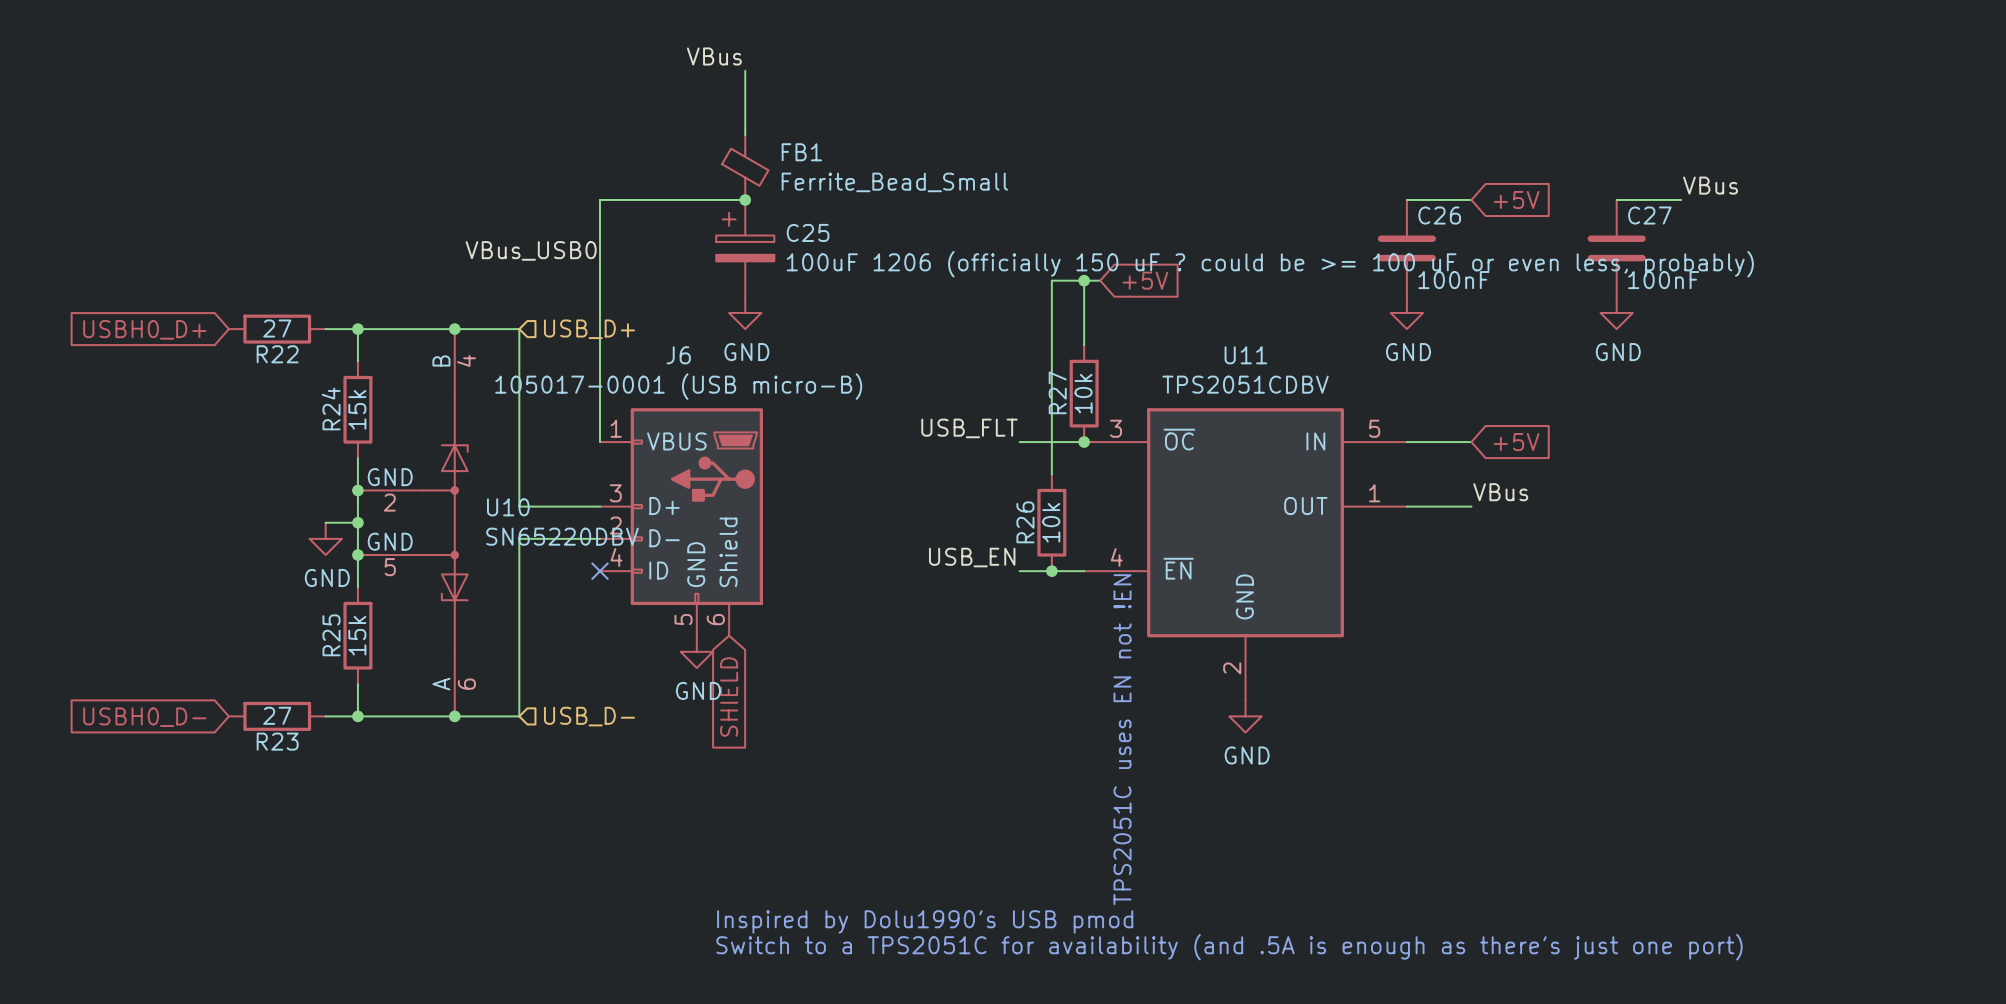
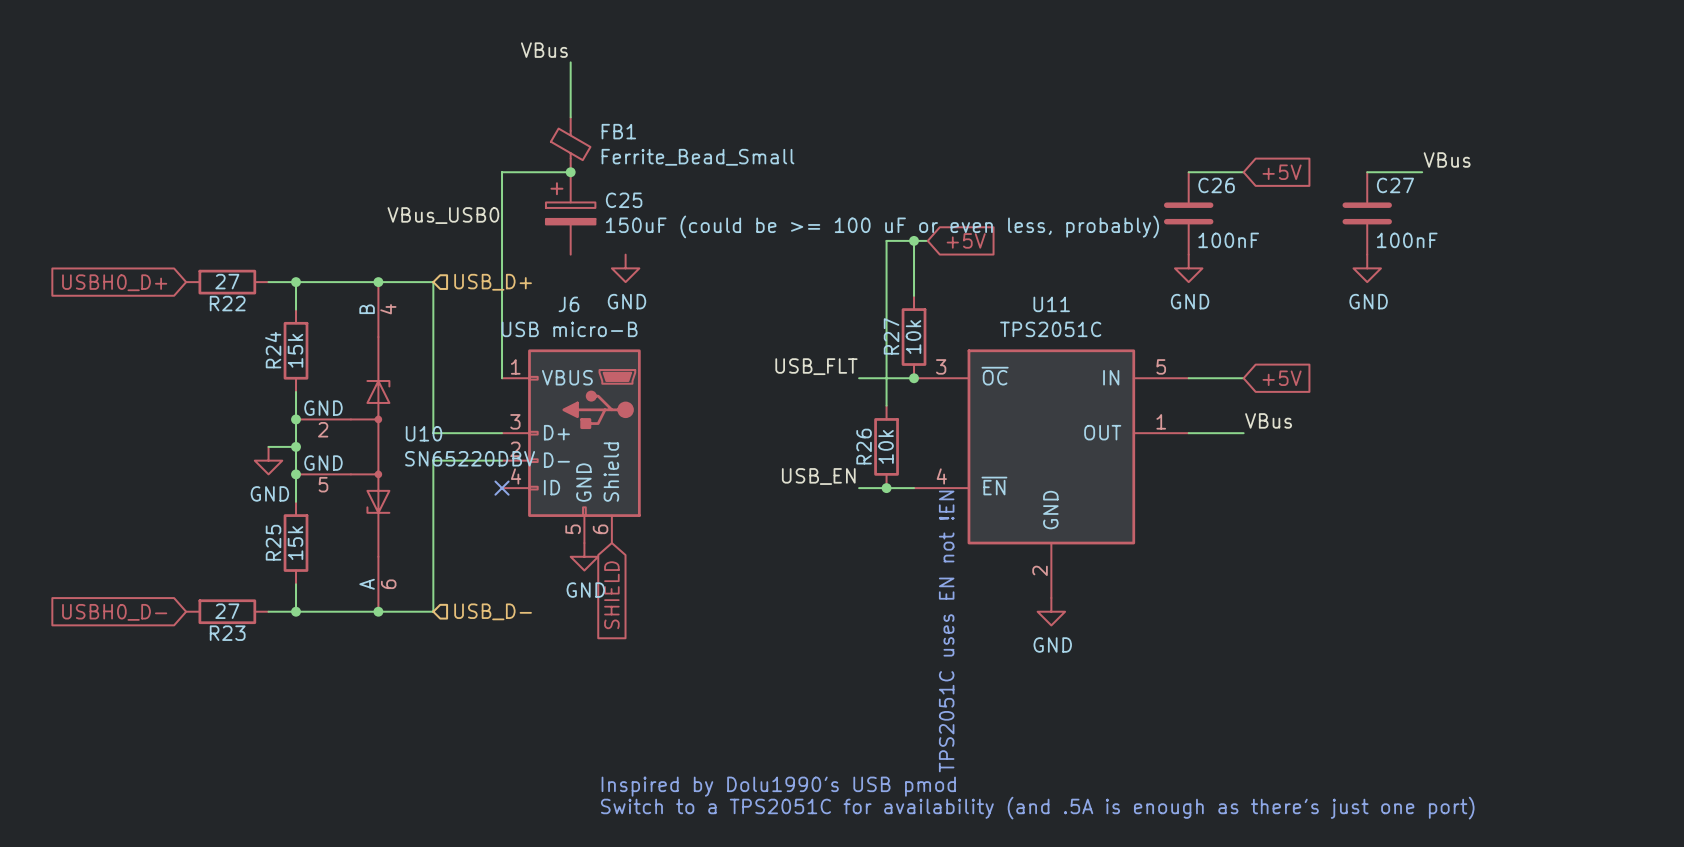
label position: VBus (714, 56) -> VBus (544, 50)
wire: (745, 70) (745, 135) -> (570, 62) (570, 117)
FB1 position: (745, 167) -> (570, 144)
wire: (680, 199) (745, 199) -> none
junction position: (745, 199) -> (570, 172)
C25 position: (745, 248) -> (570, 213)
C25 value: 100uF 1206 (officially 150 uF ? could be >= 100 uF or even less, probably) (1270, 264) -> 150uF (could be >= 100 uF or even less, probably) (882, 226)
U11 value: TPS2051CDBV (1245, 384) -> TPS2051C (1050, 329)
J6 value: 105017-0001 (USB micro-B) (678, 386) -> USB micro-B (569, 329)

